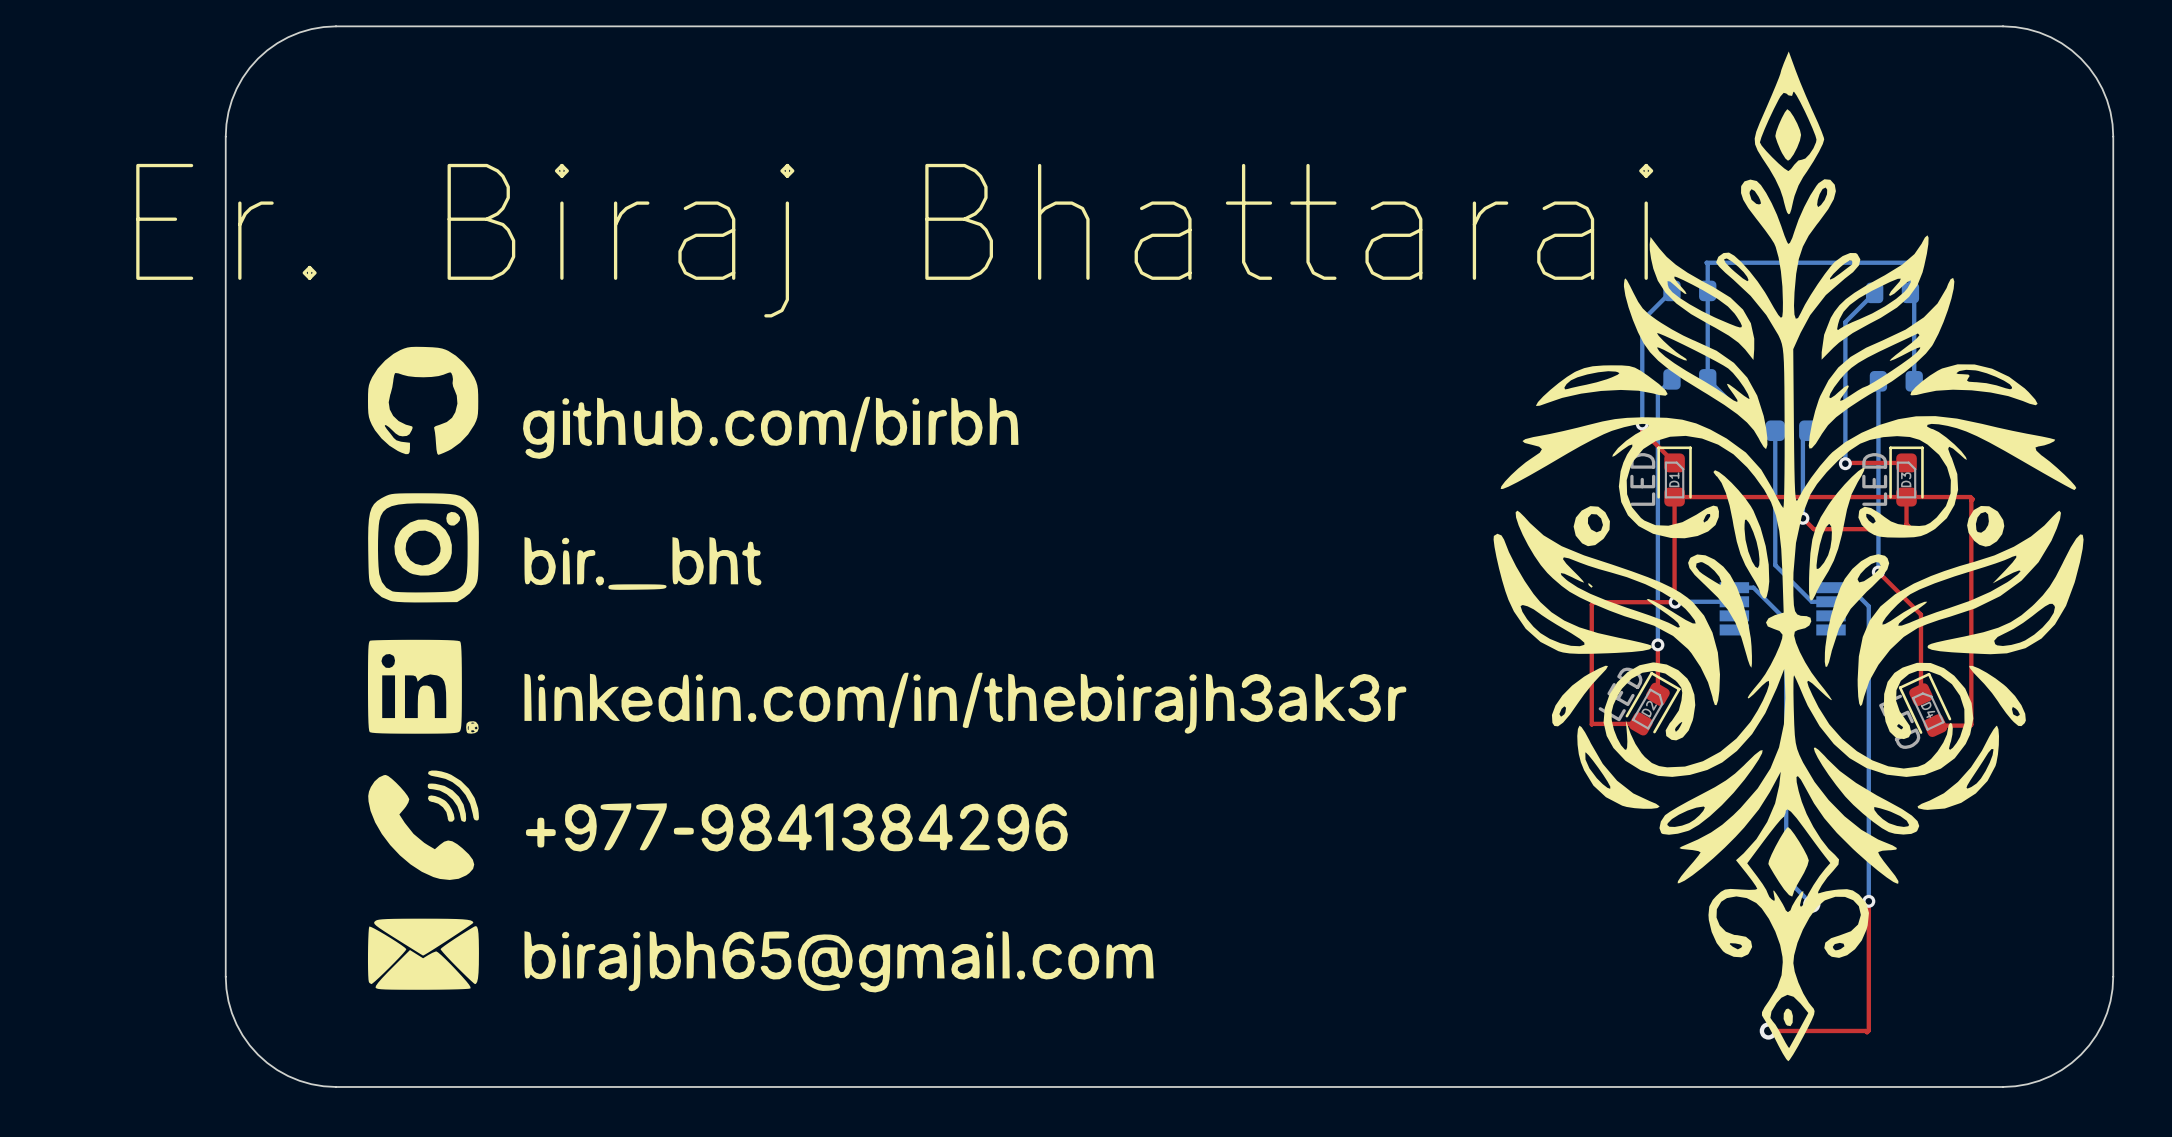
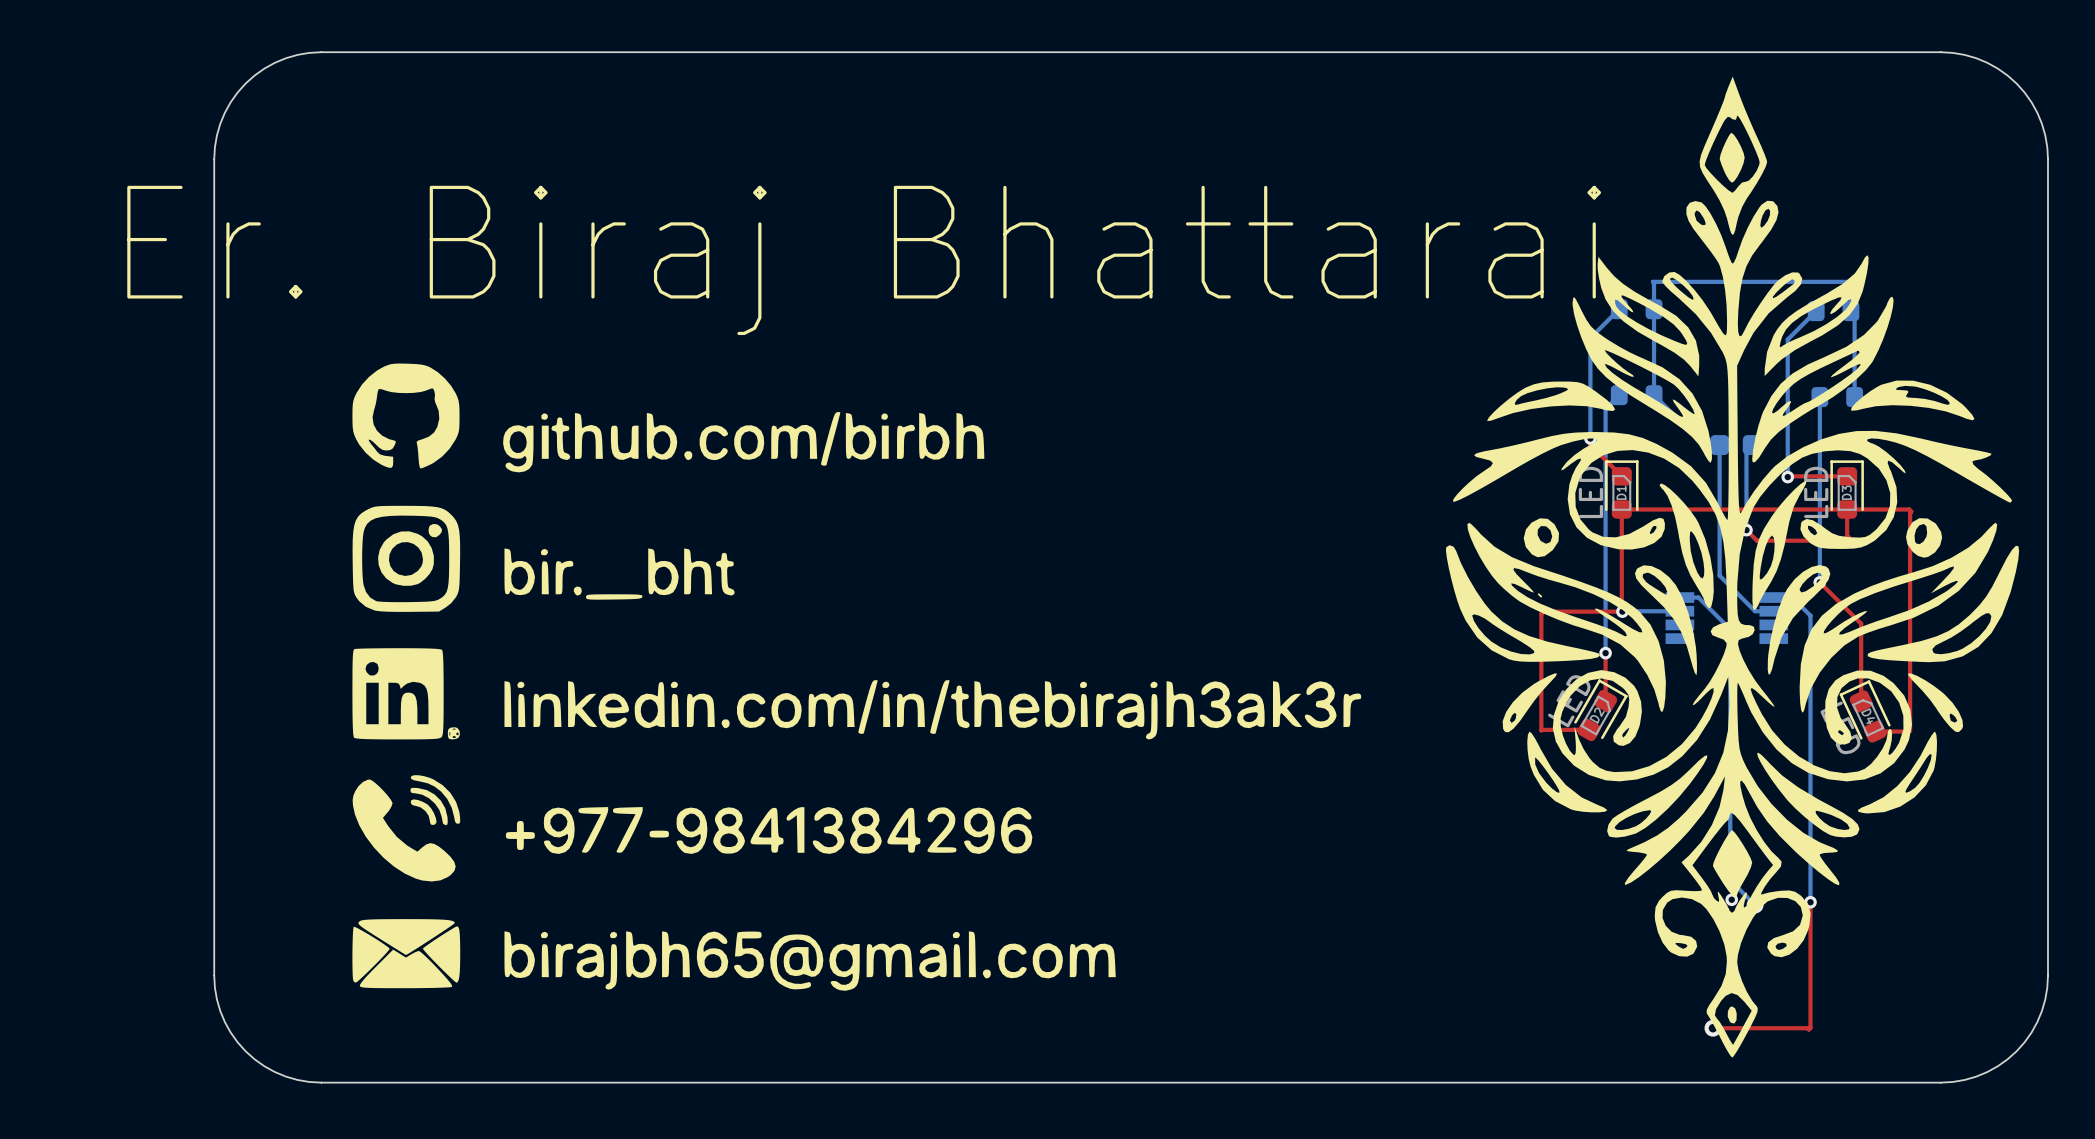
via: none -> (1731, 899)

